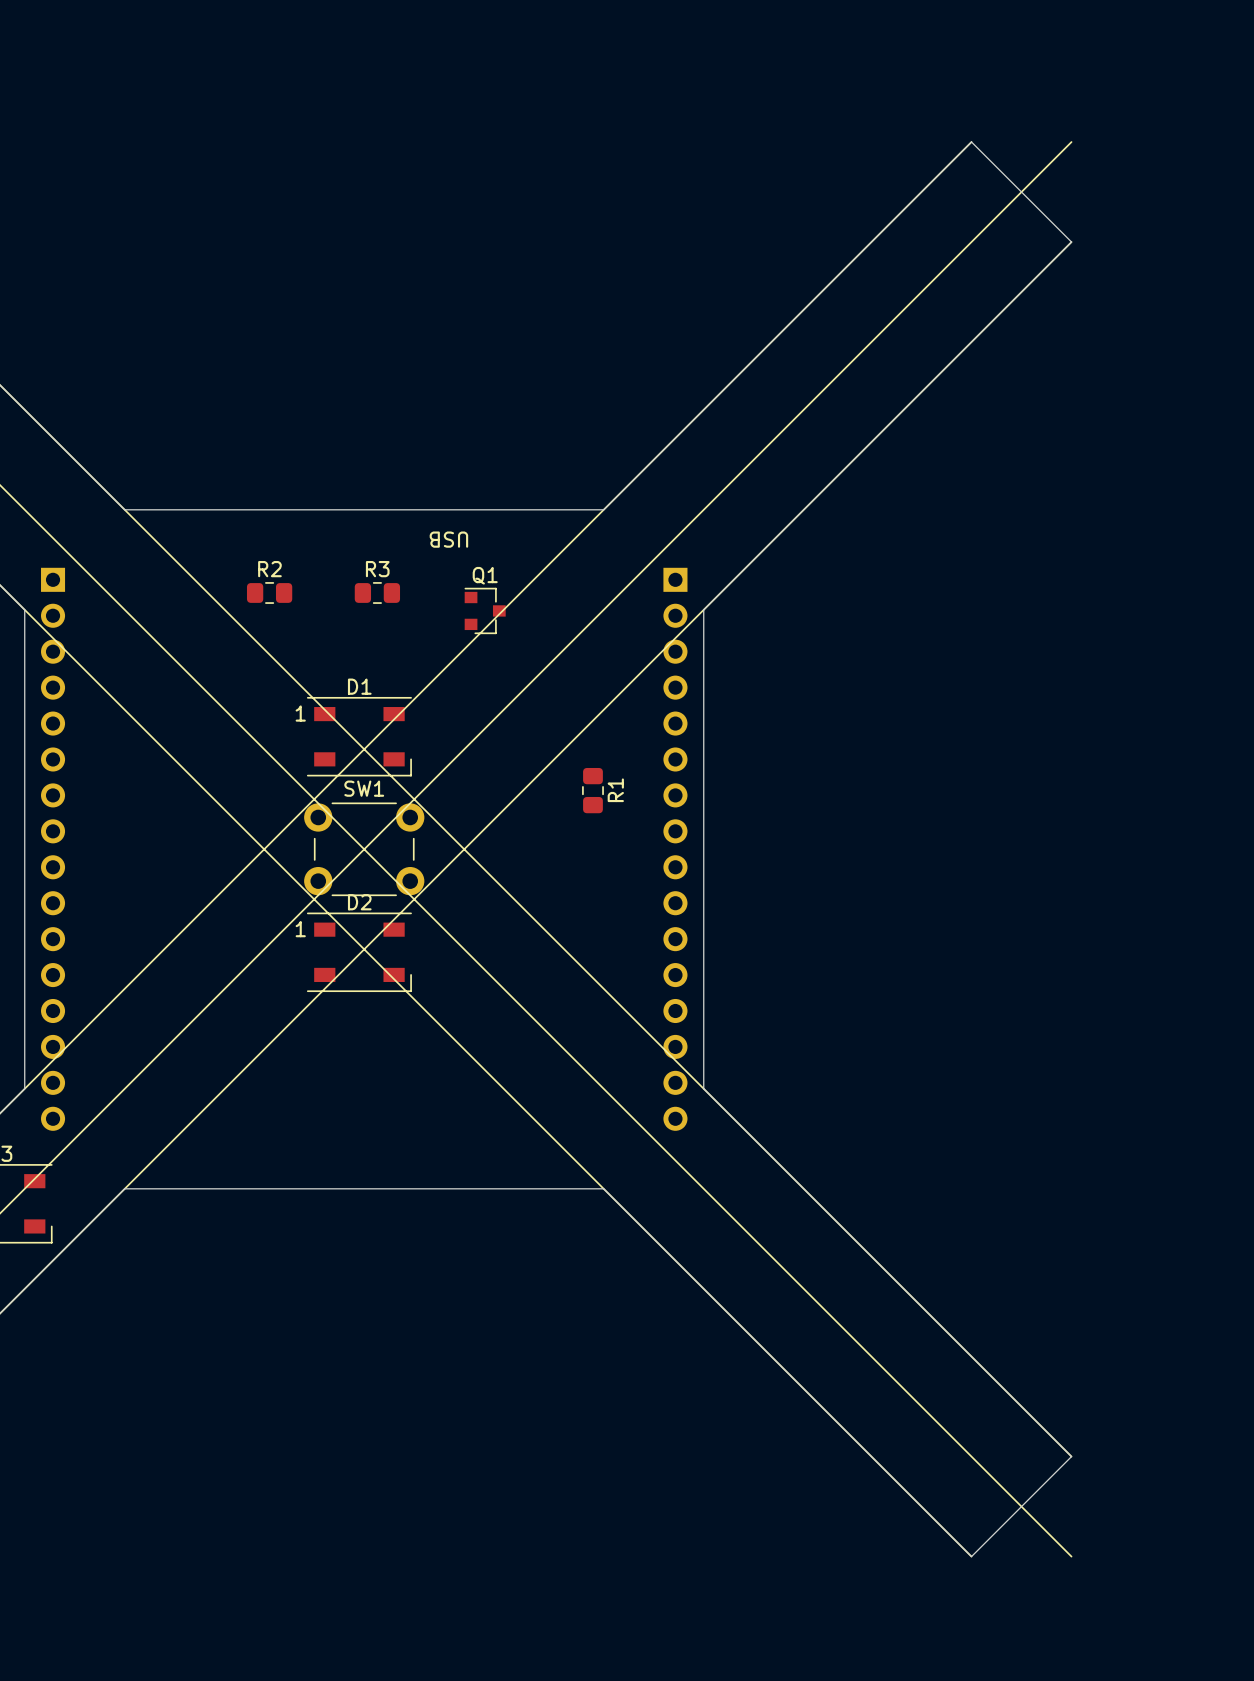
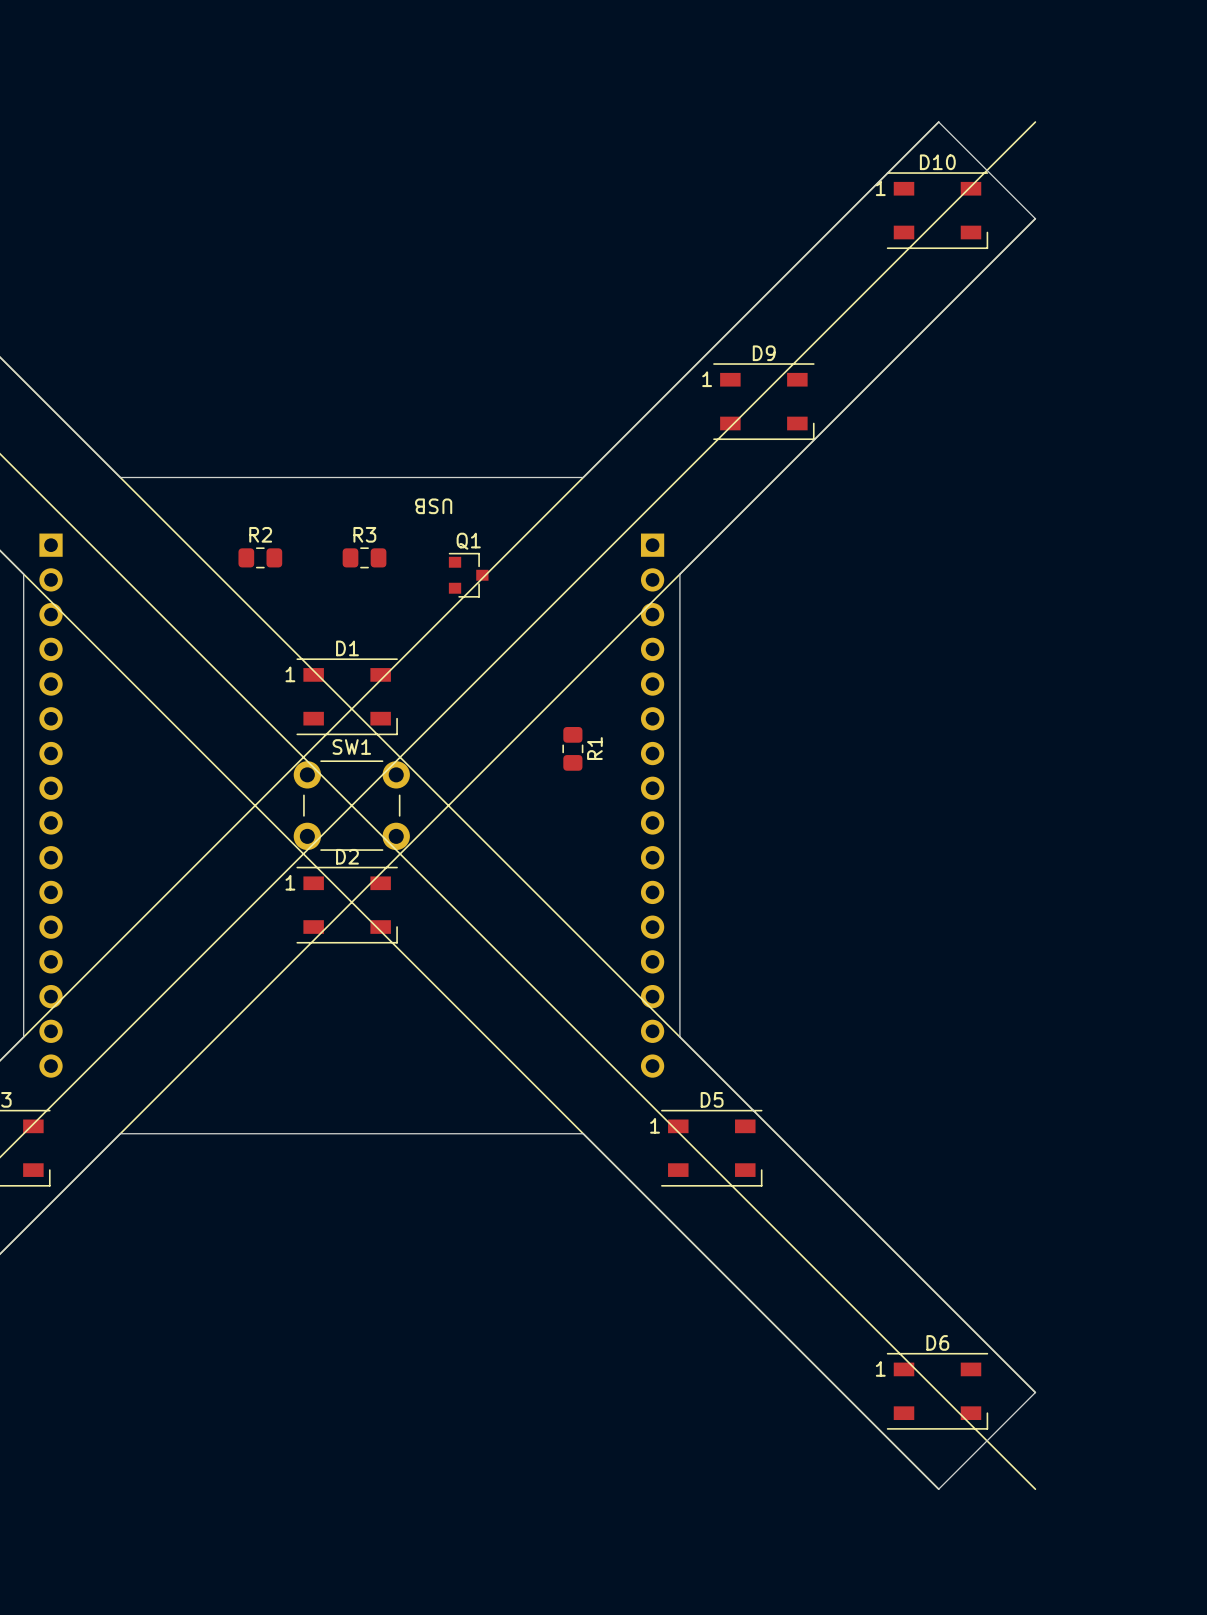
D10: none -> (937, 210)
D9: none -> (763, 401)
D5: none -> (711, 1148)
D6: none -> (937, 1391)

